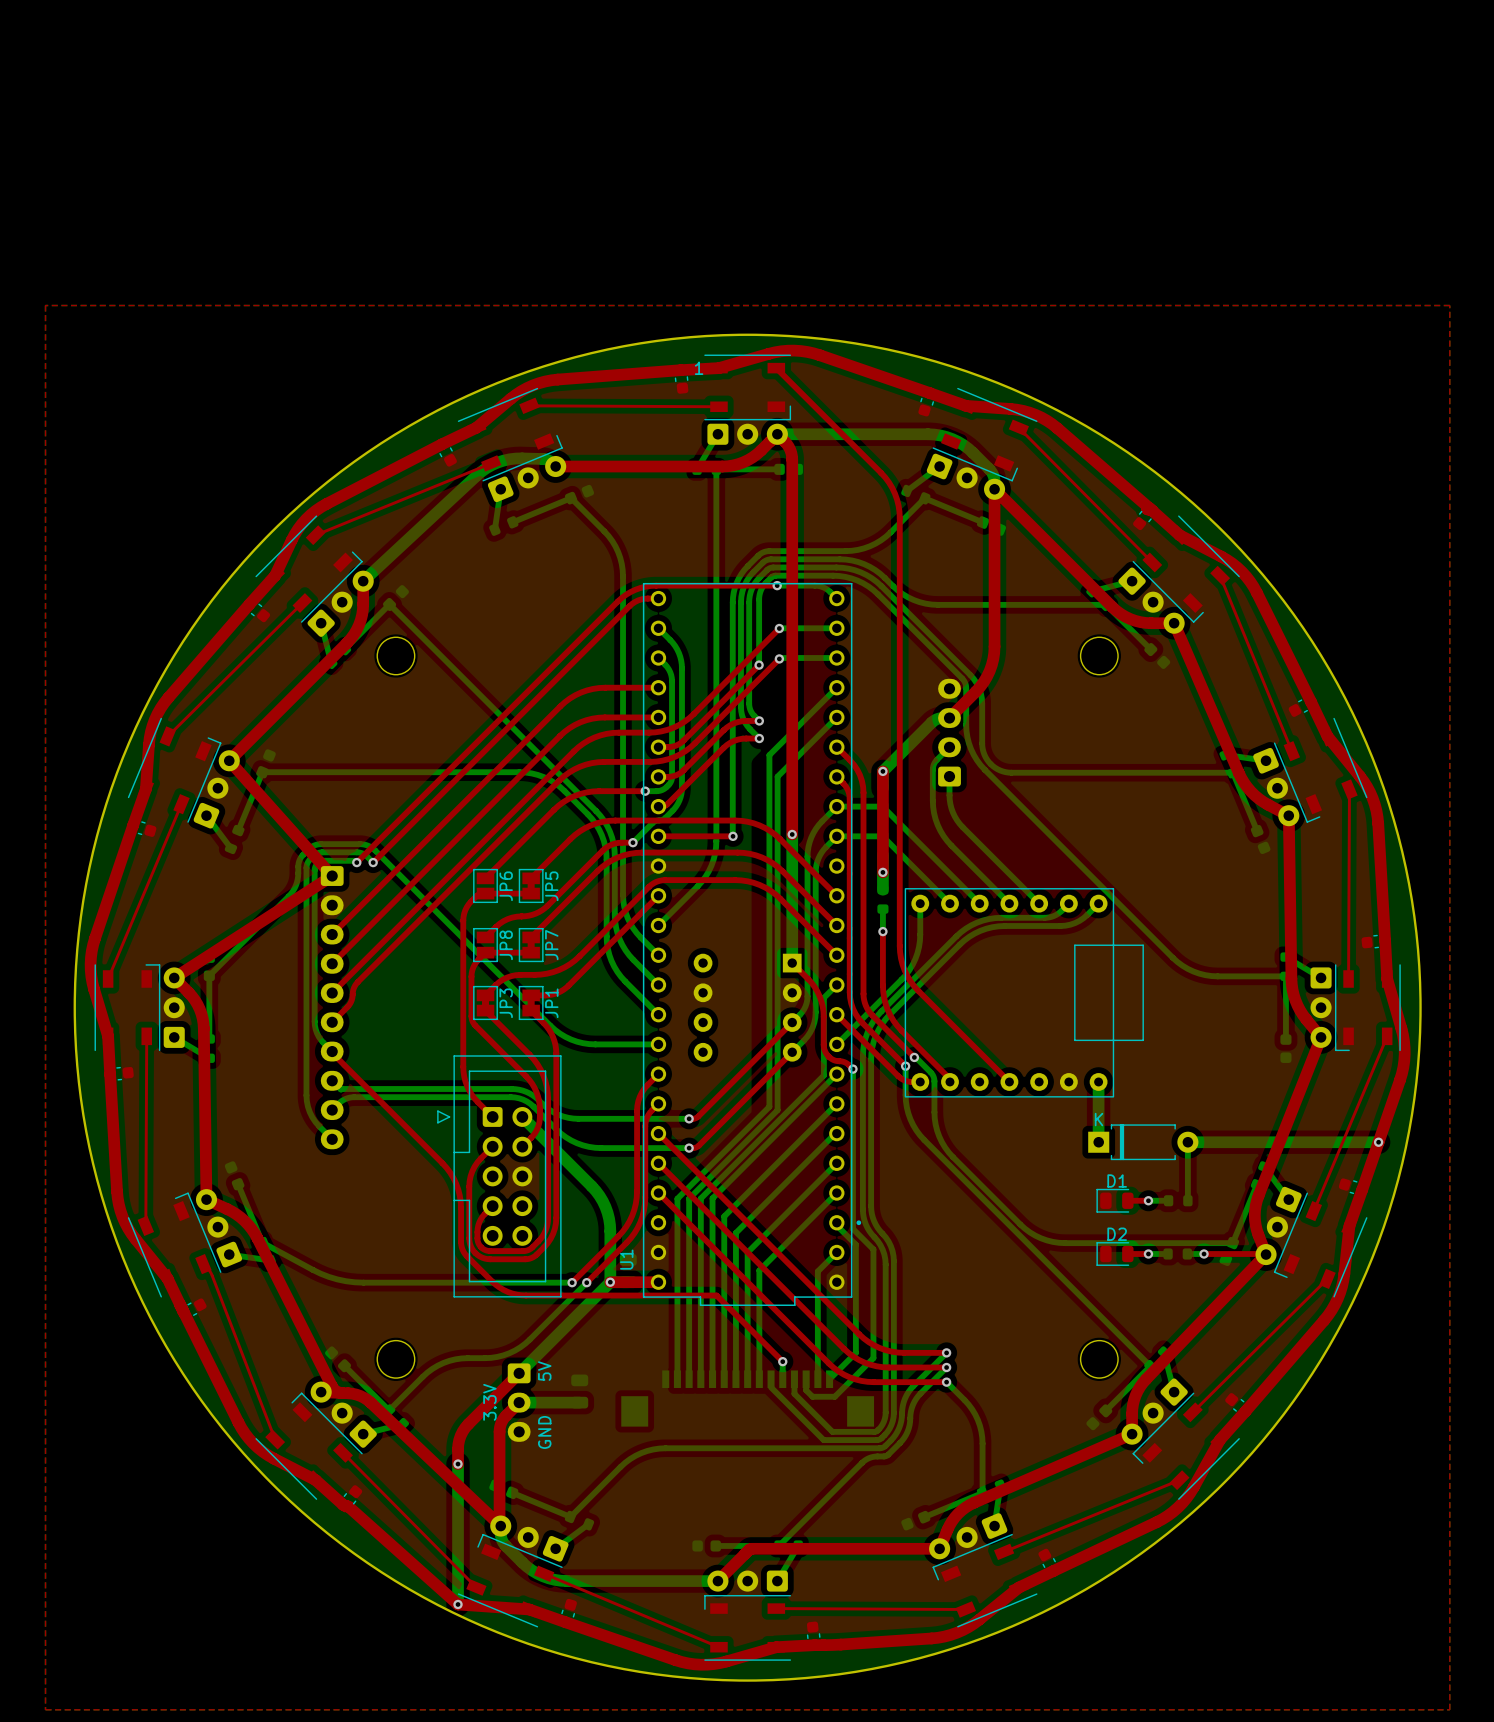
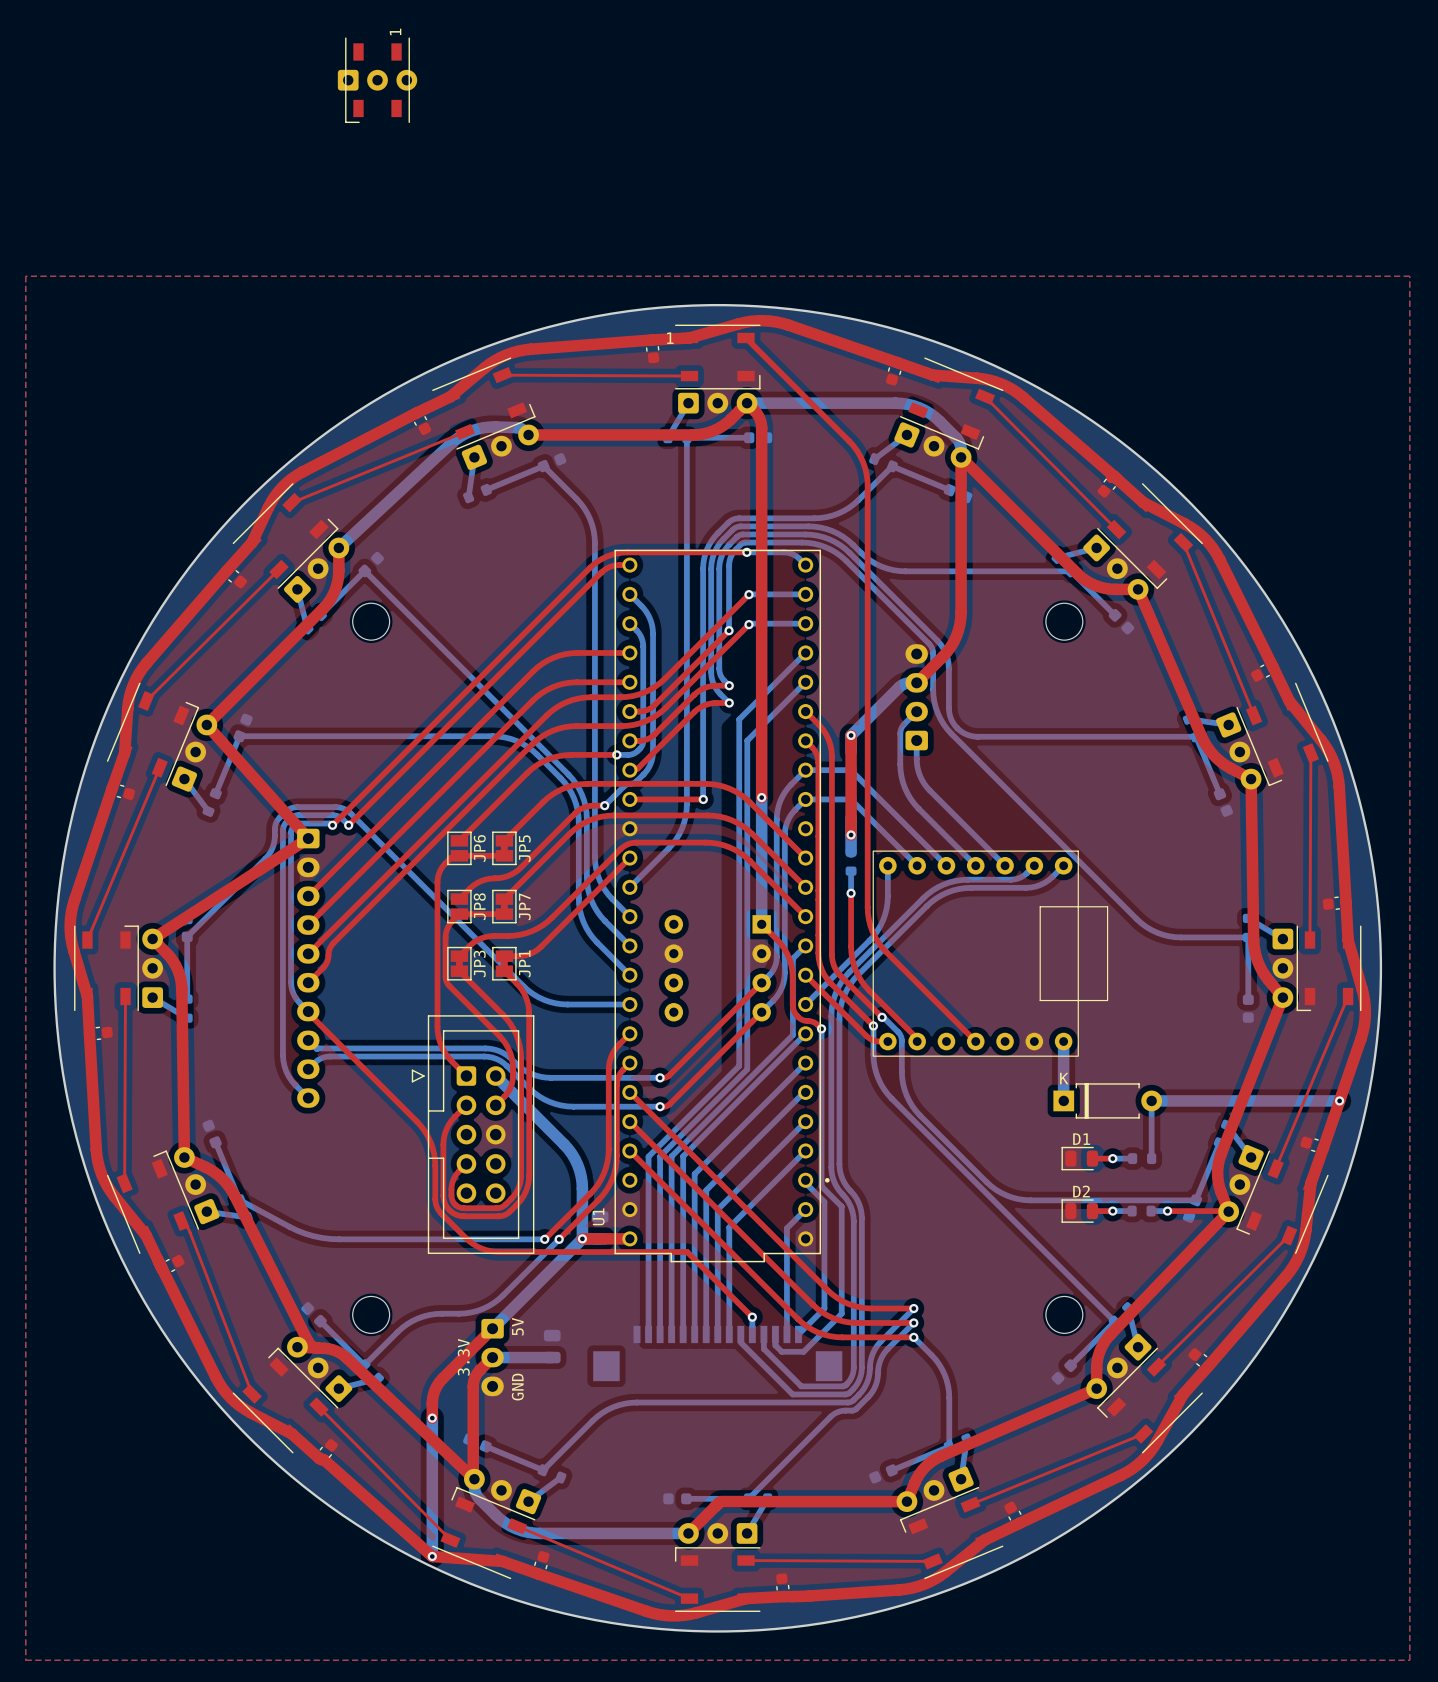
part: none -> (377, 80)
part: none -> (377, 80)

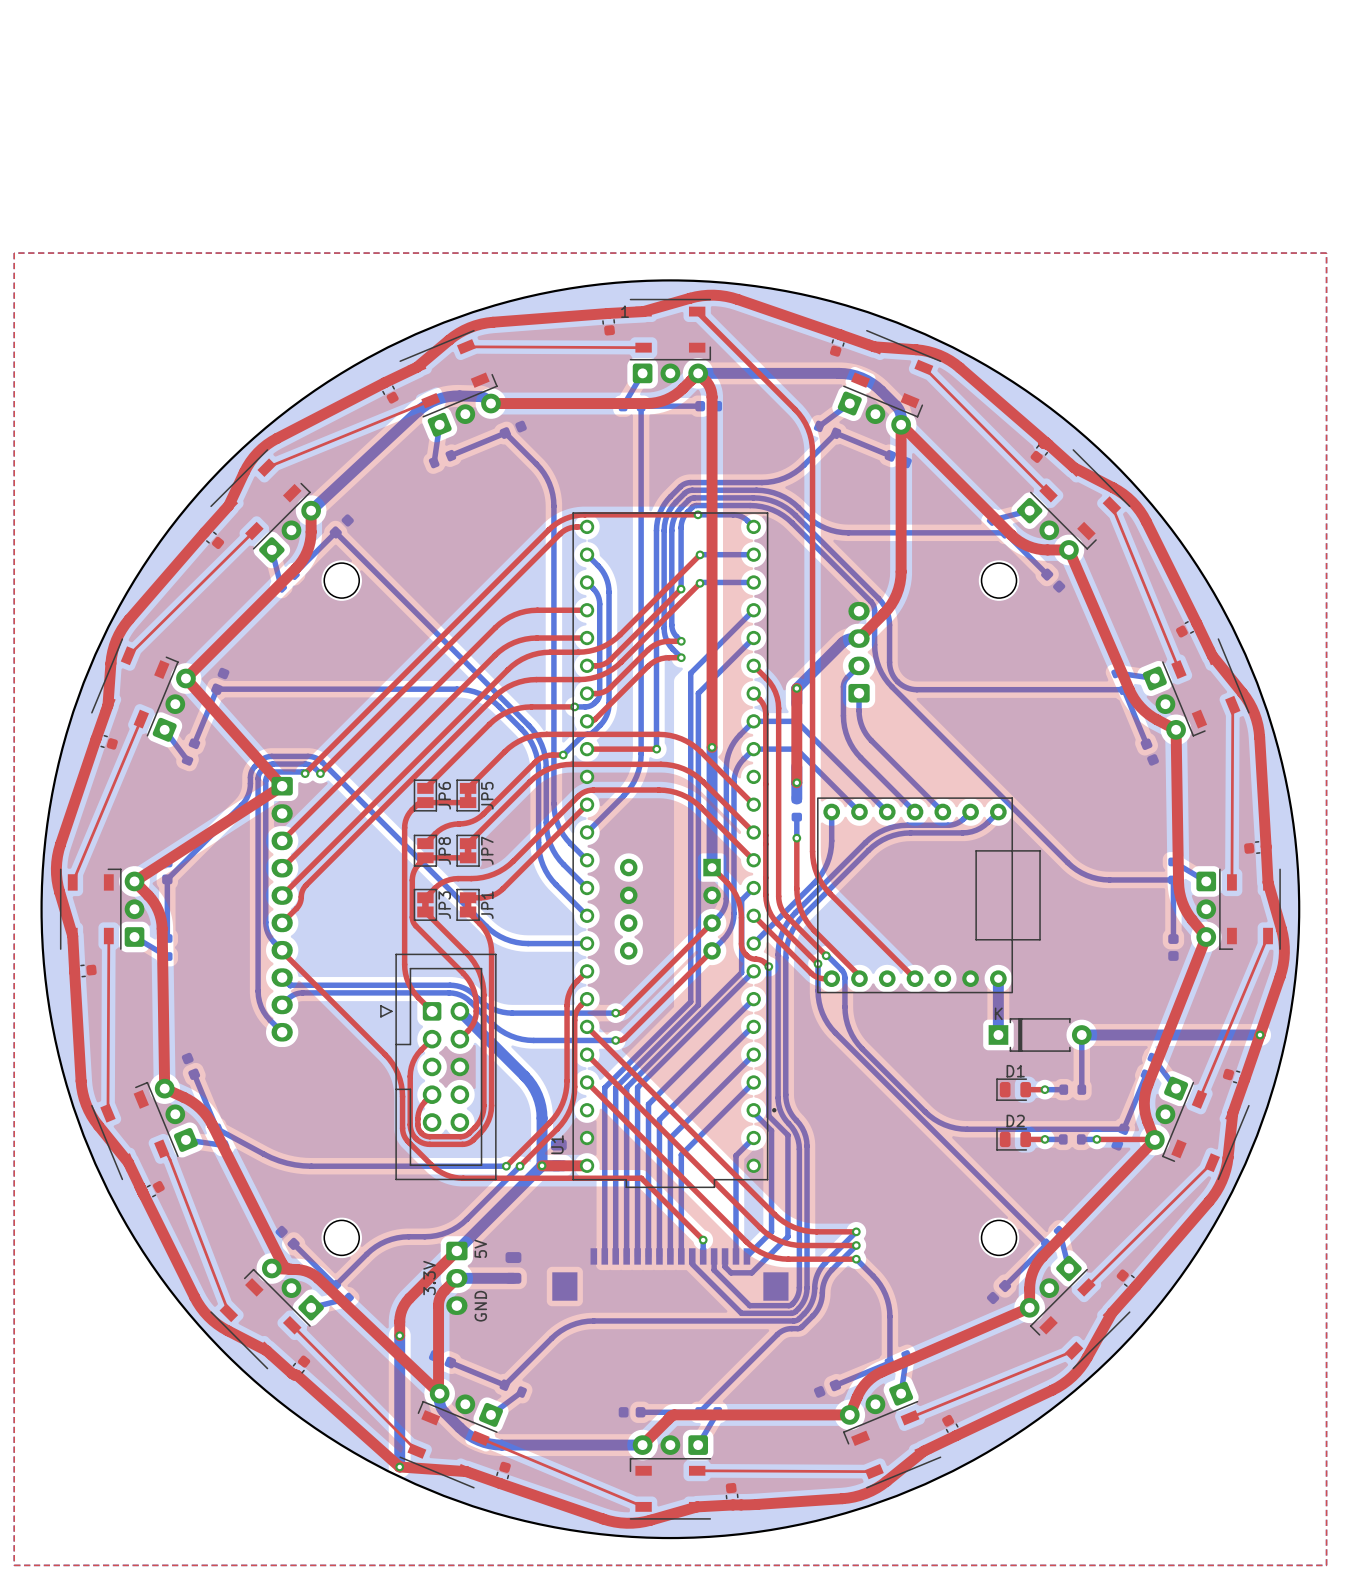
part: (377, 80) -> none
part: (377, 80) -> none

